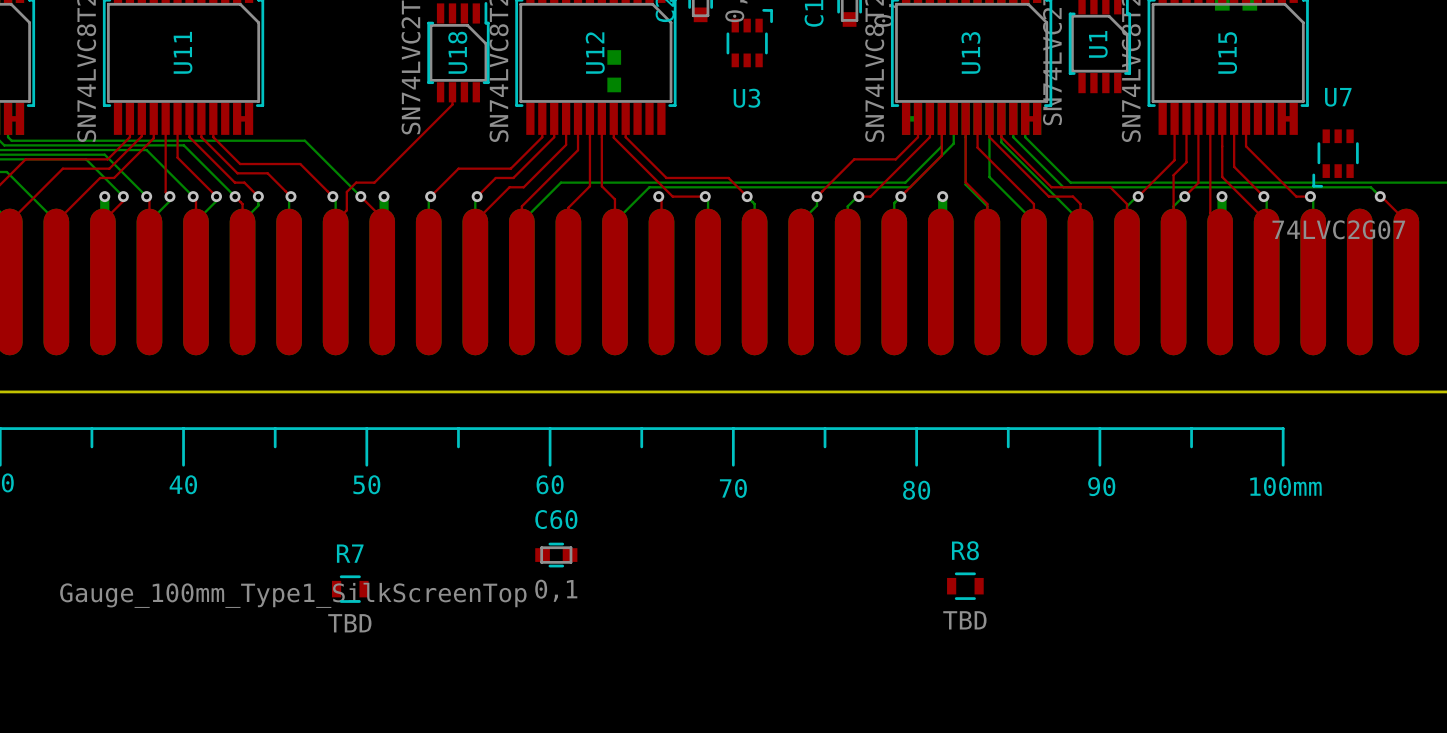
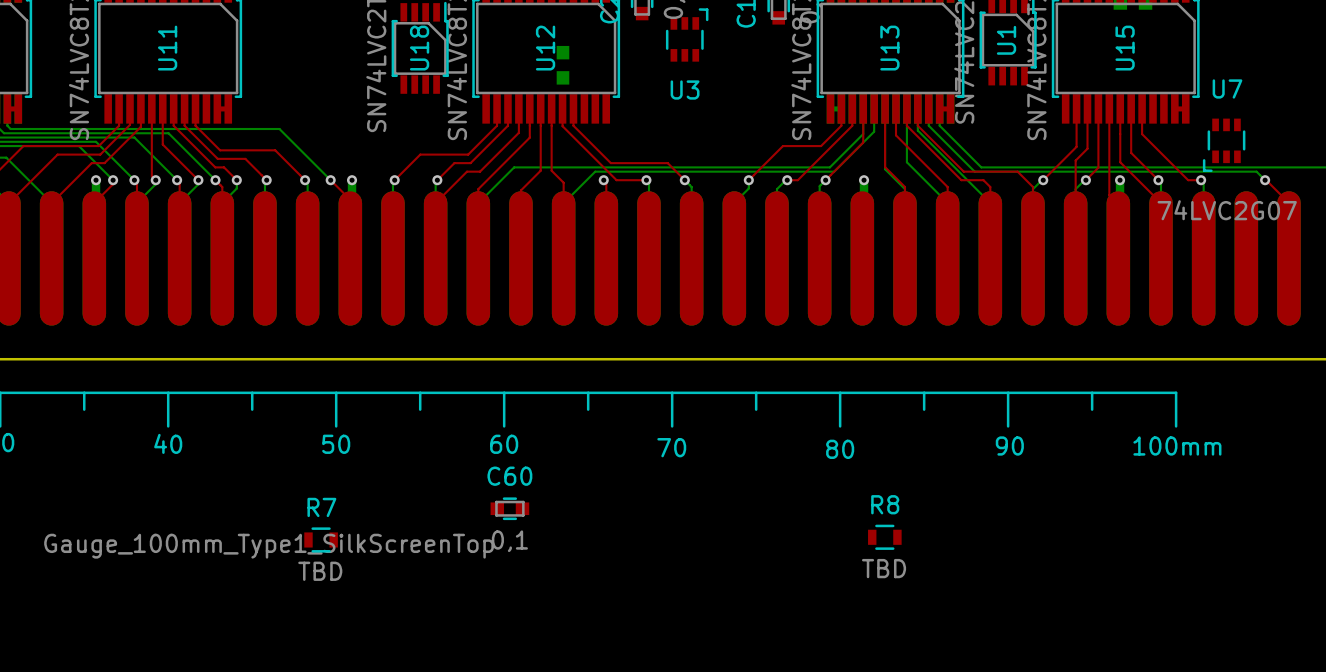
top track: (452, 92) (452, 104) (374, 182) (356, 182) (346, 191) (346, 210) (335, 221) (335, 281) -> none

